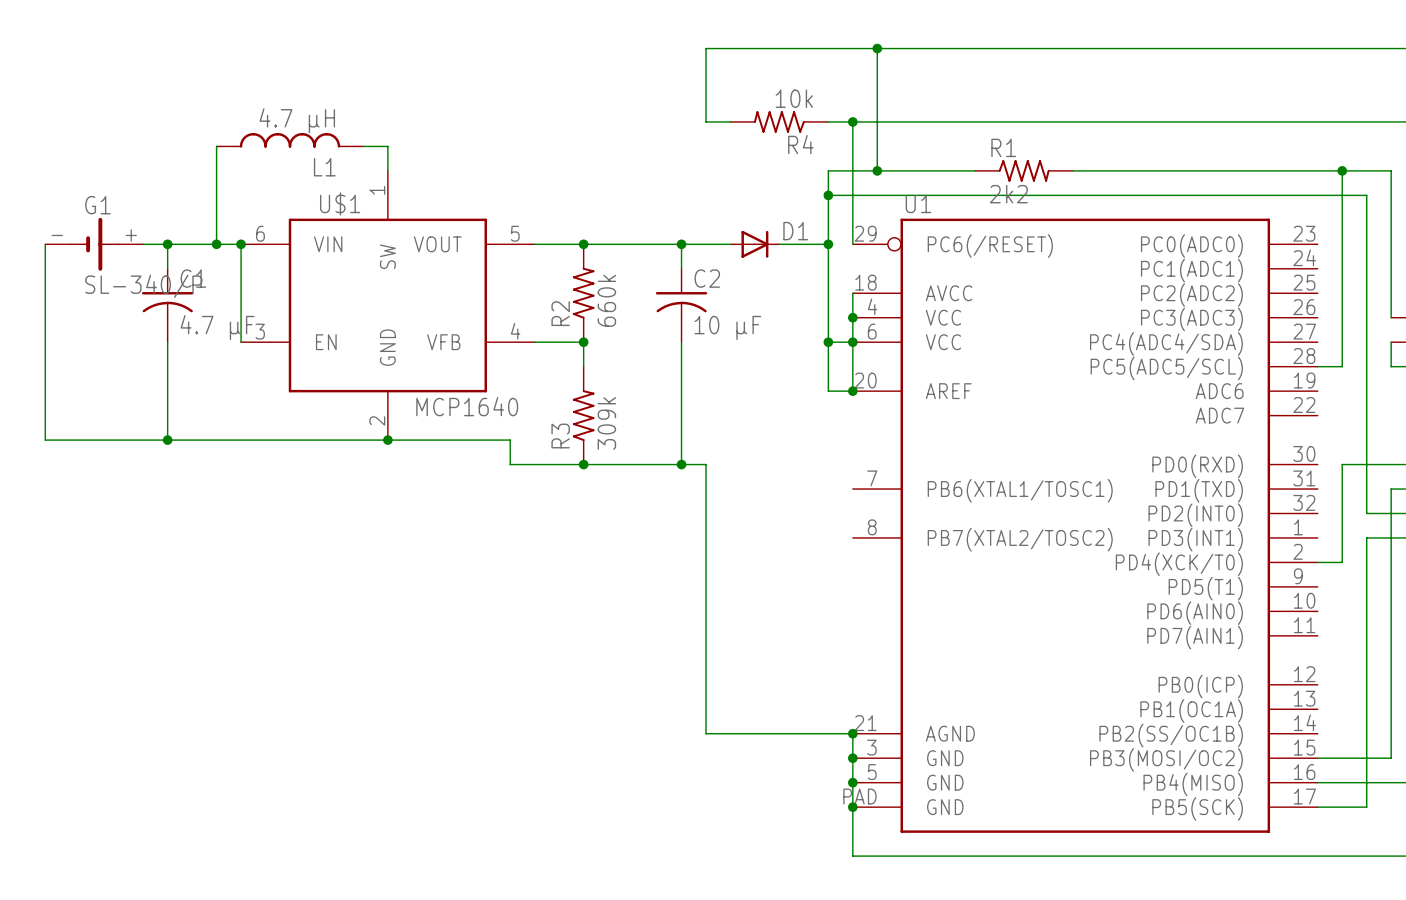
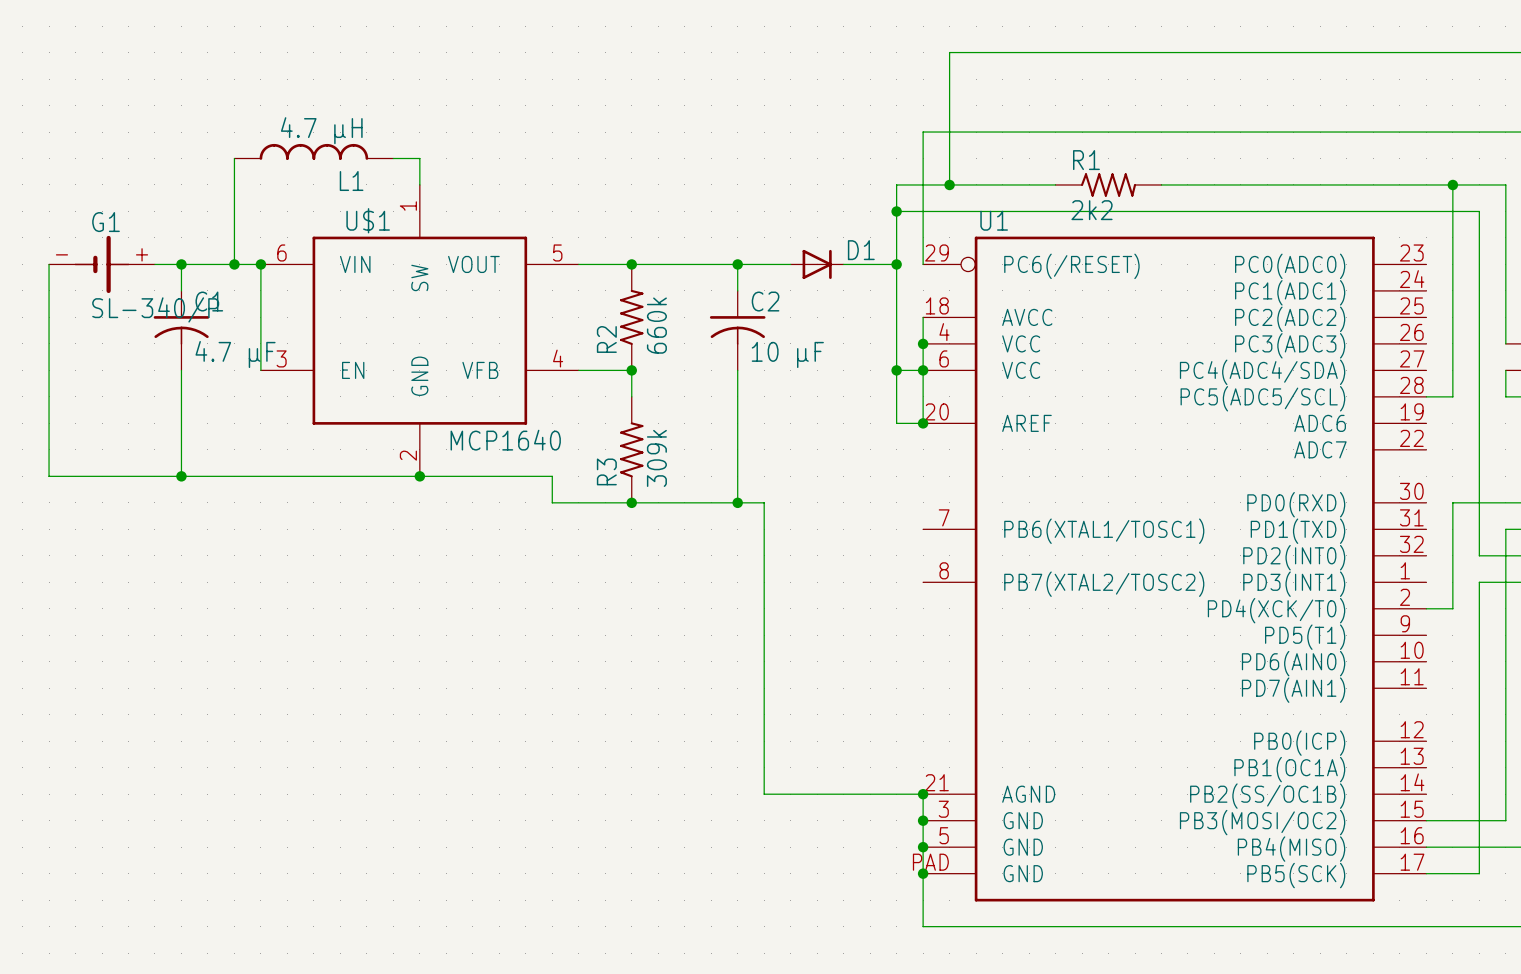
wire: (877, 48) (706, 48) (706, 121) (730, 121) -> none
junction: (877, 48) -> none
R4: 10k (779, 121) -> none
wire: (828, 121) (852, 121) -> none
junction: (852, 121) -> none

